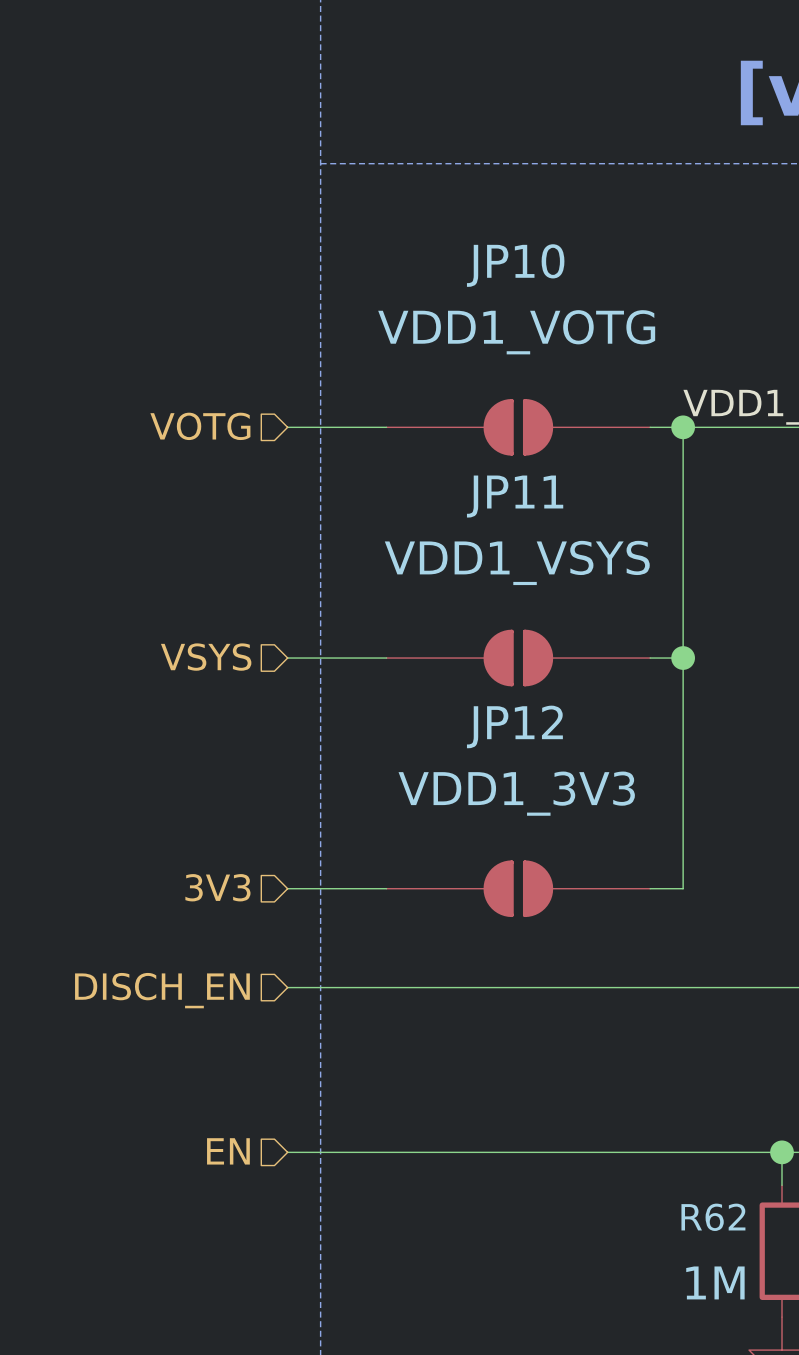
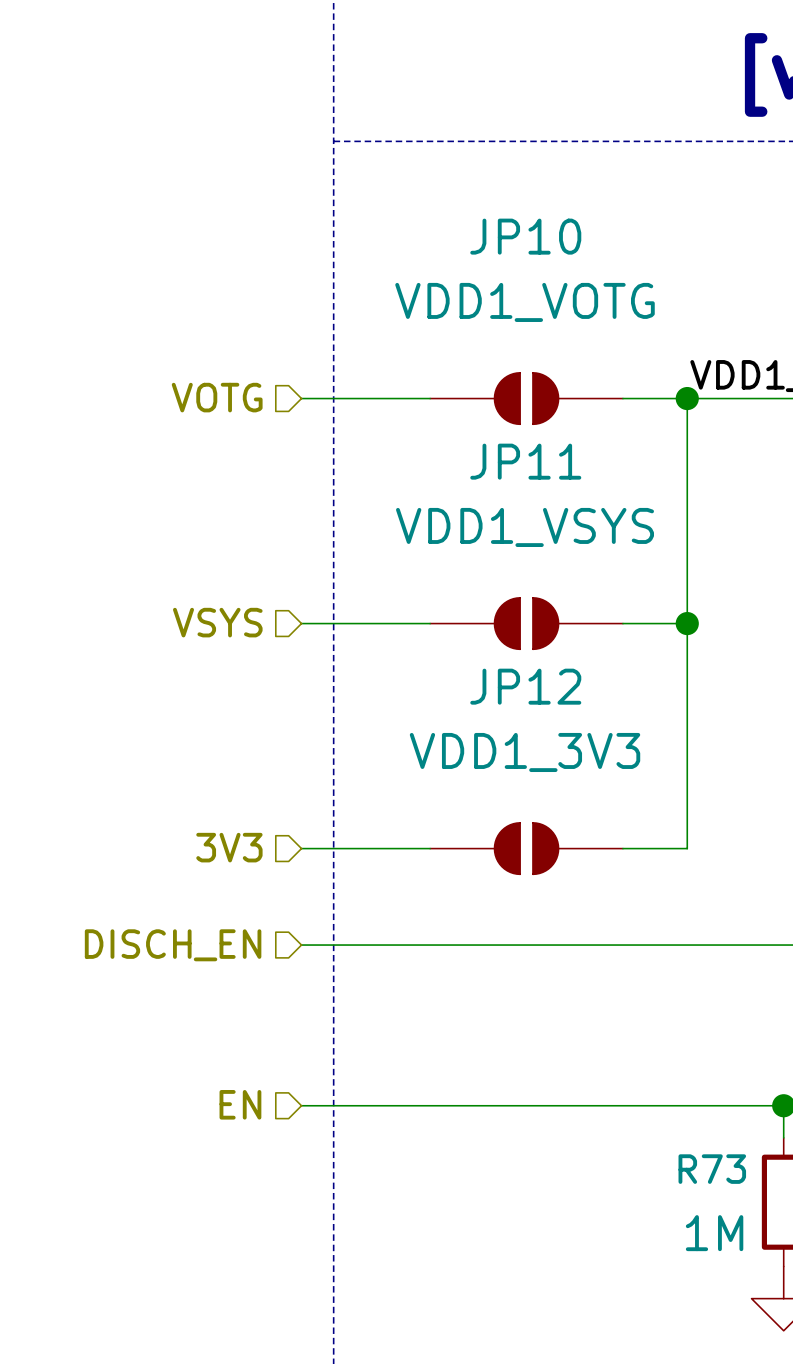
JP10 symbol: [386, 398, 651, 456] -> [430, 372, 623, 425]
JP11 symbol: [386, 629, 651, 687] -> [430, 597, 623, 650]
JP12 symbol: [386, 860, 651, 918] -> [430, 822, 623, 875]
R62 name: R62 (713, 1217) -> R73 (712, 1169)

